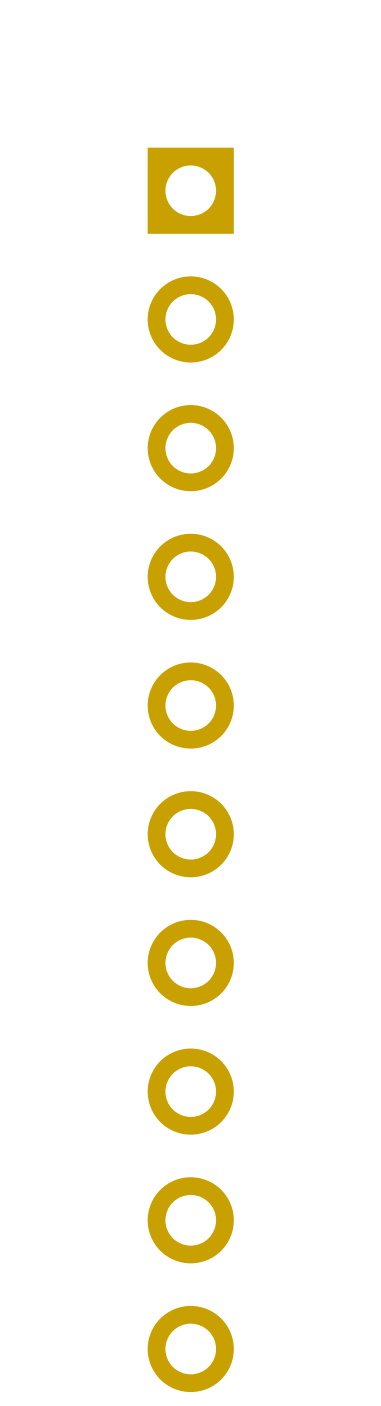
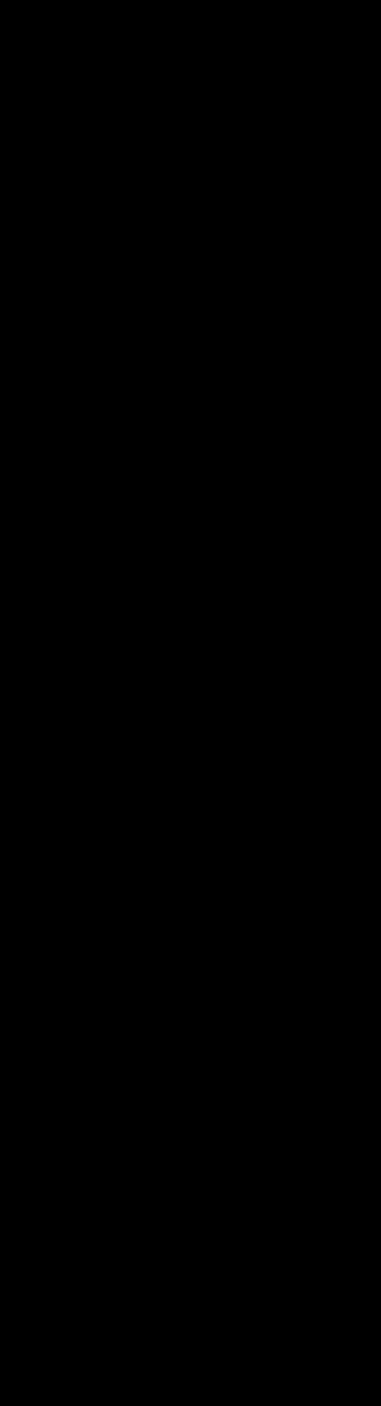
part: (190, 769) -> none

